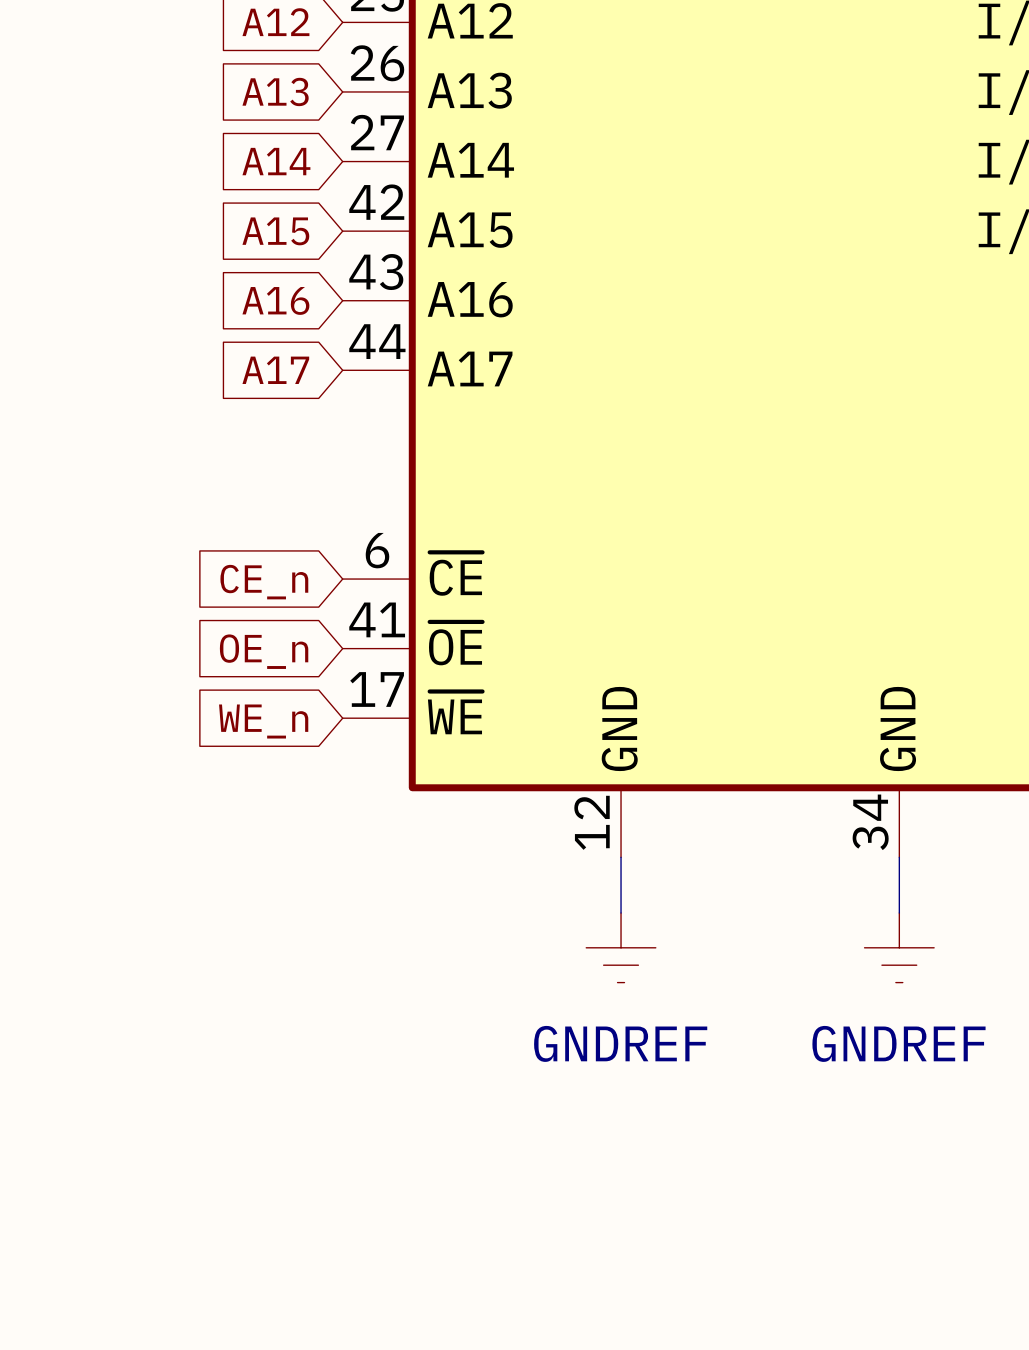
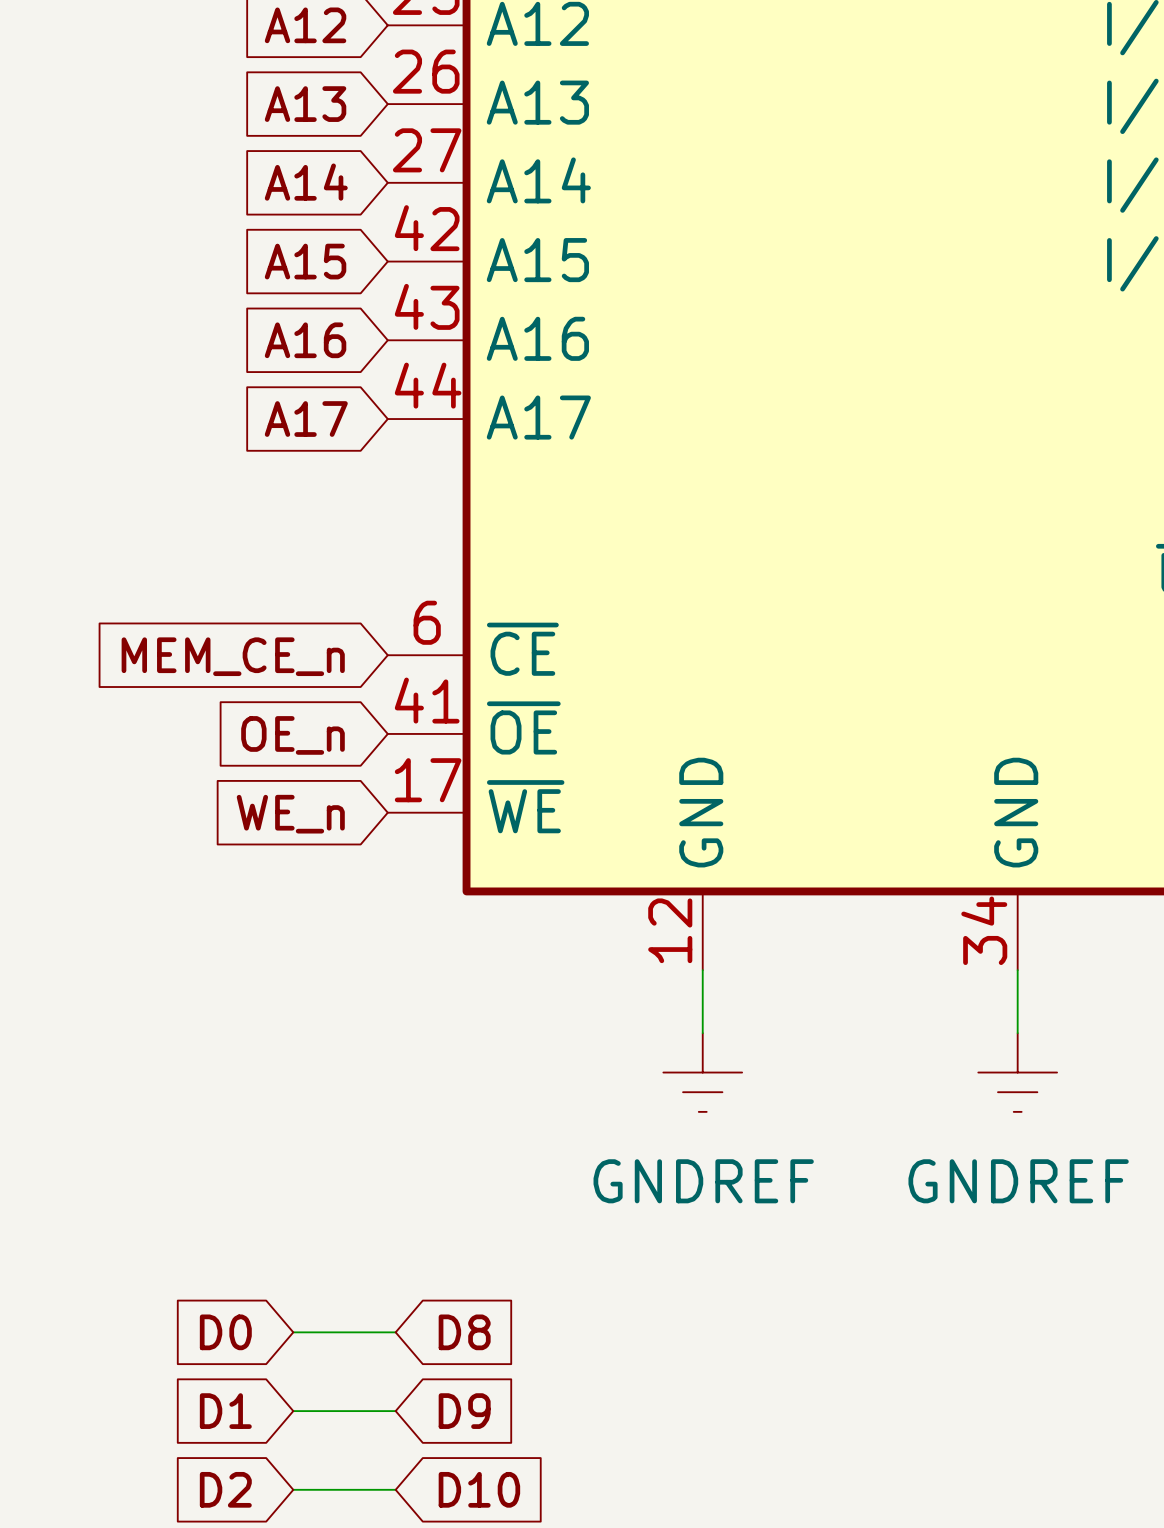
global label: CE_n (264, 582) -> MEM_CE_n (233, 656)
global label: none -> D0 (225, 1332)
wire: none -> (293, 1332) (395, 1332)
global label: none -> D8 (464, 1332)
global label: none -> D1 (225, 1411)
wire: none -> (293, 1411) (395, 1411)
global label: none -> D9 (464, 1411)
global label: none -> D2 (225, 1489)
wire: none -> (293, 1489) (395, 1489)
global label: none -> D10 (479, 1489)

